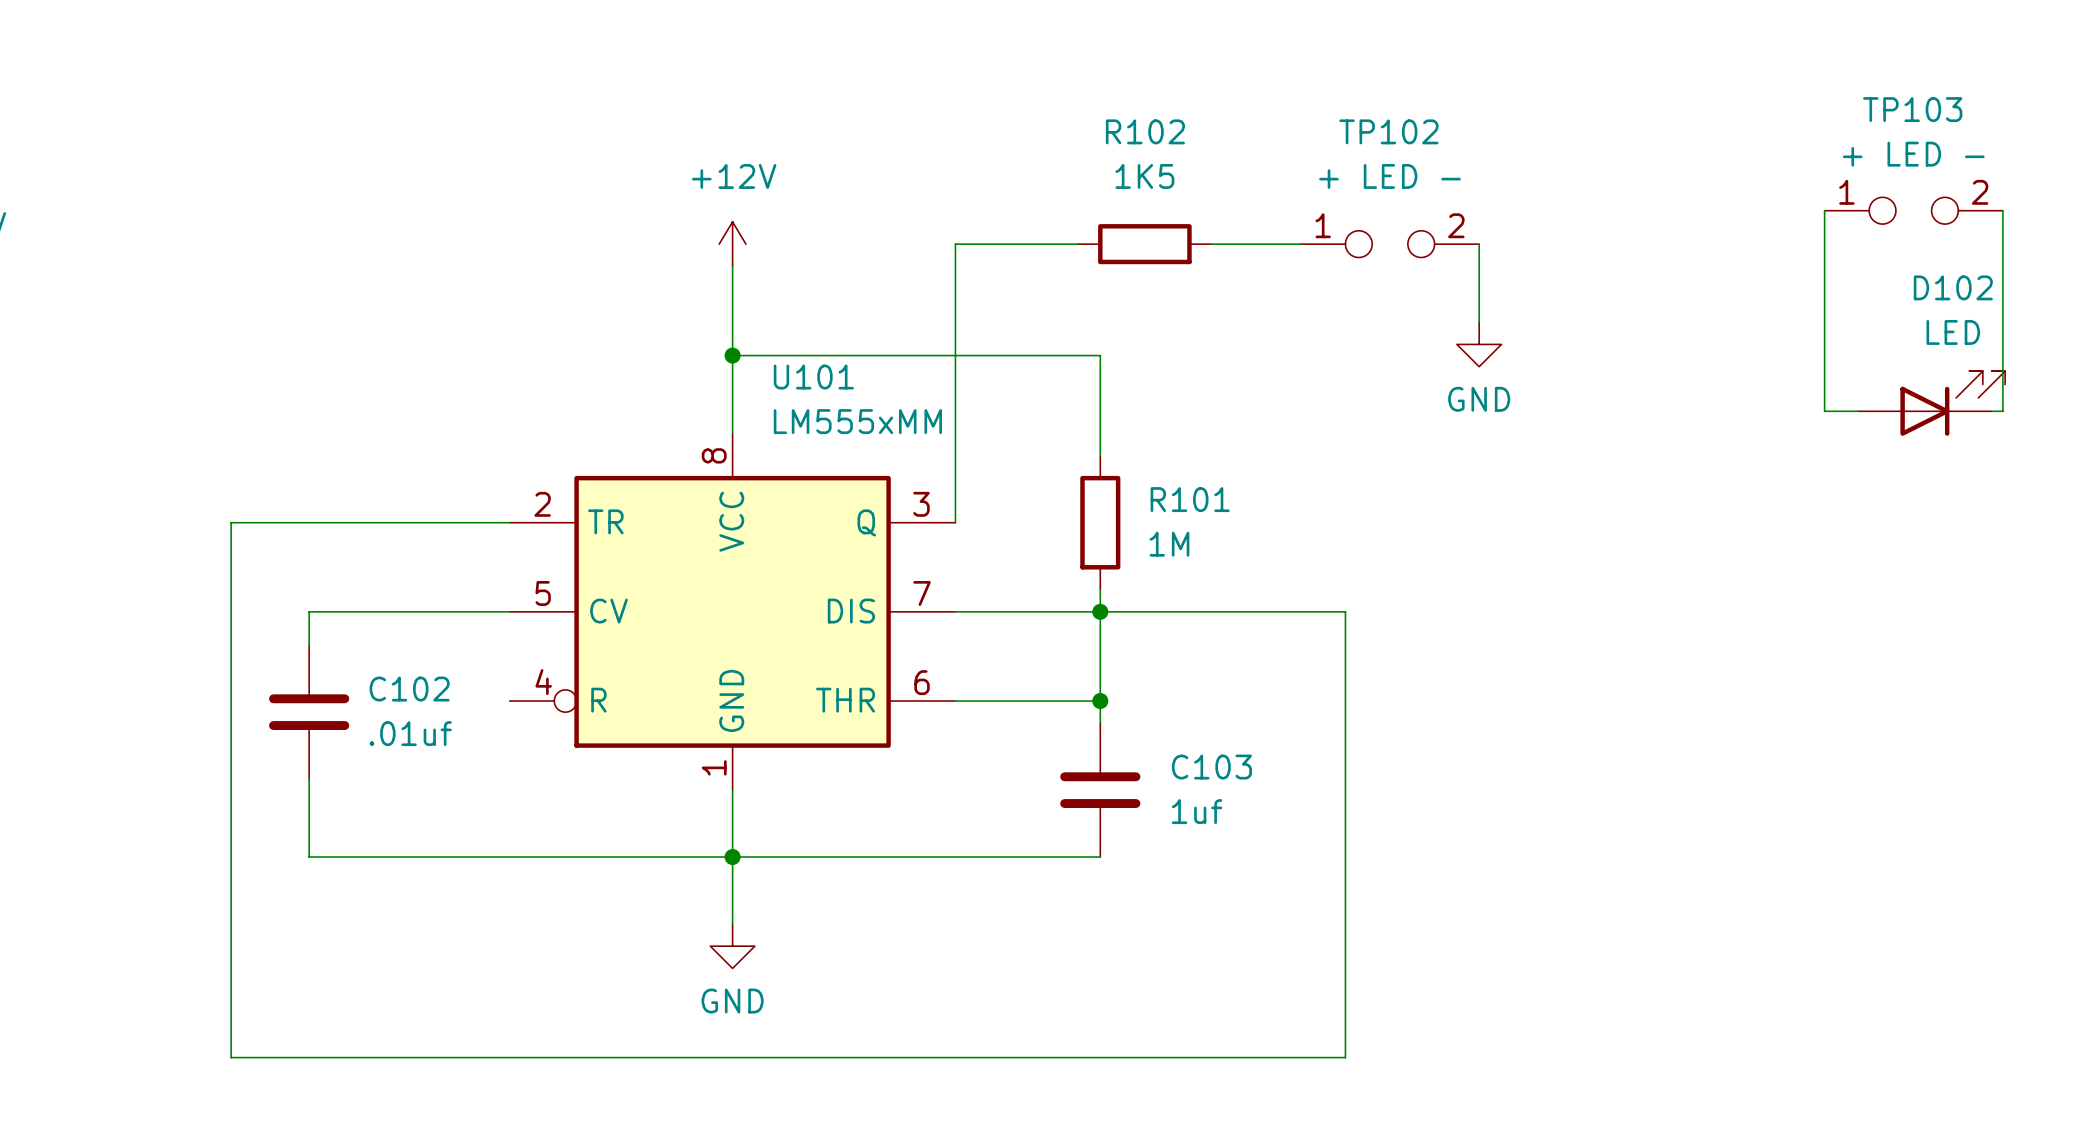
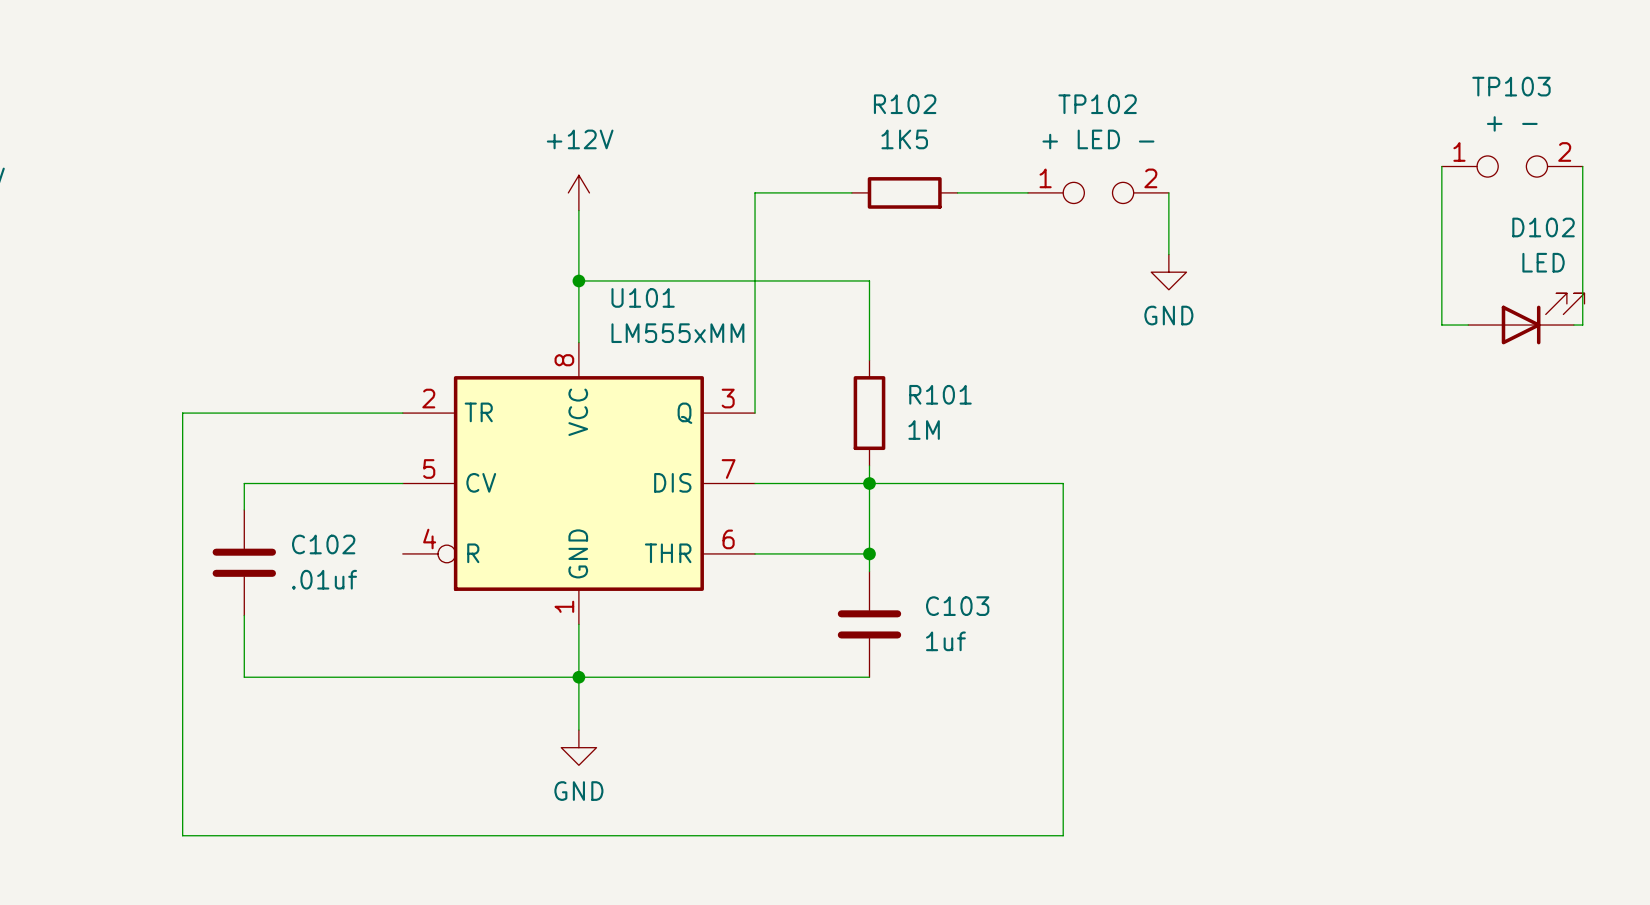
TP103 value: + LED - (1913, 154) -> + - (1512, 123)

